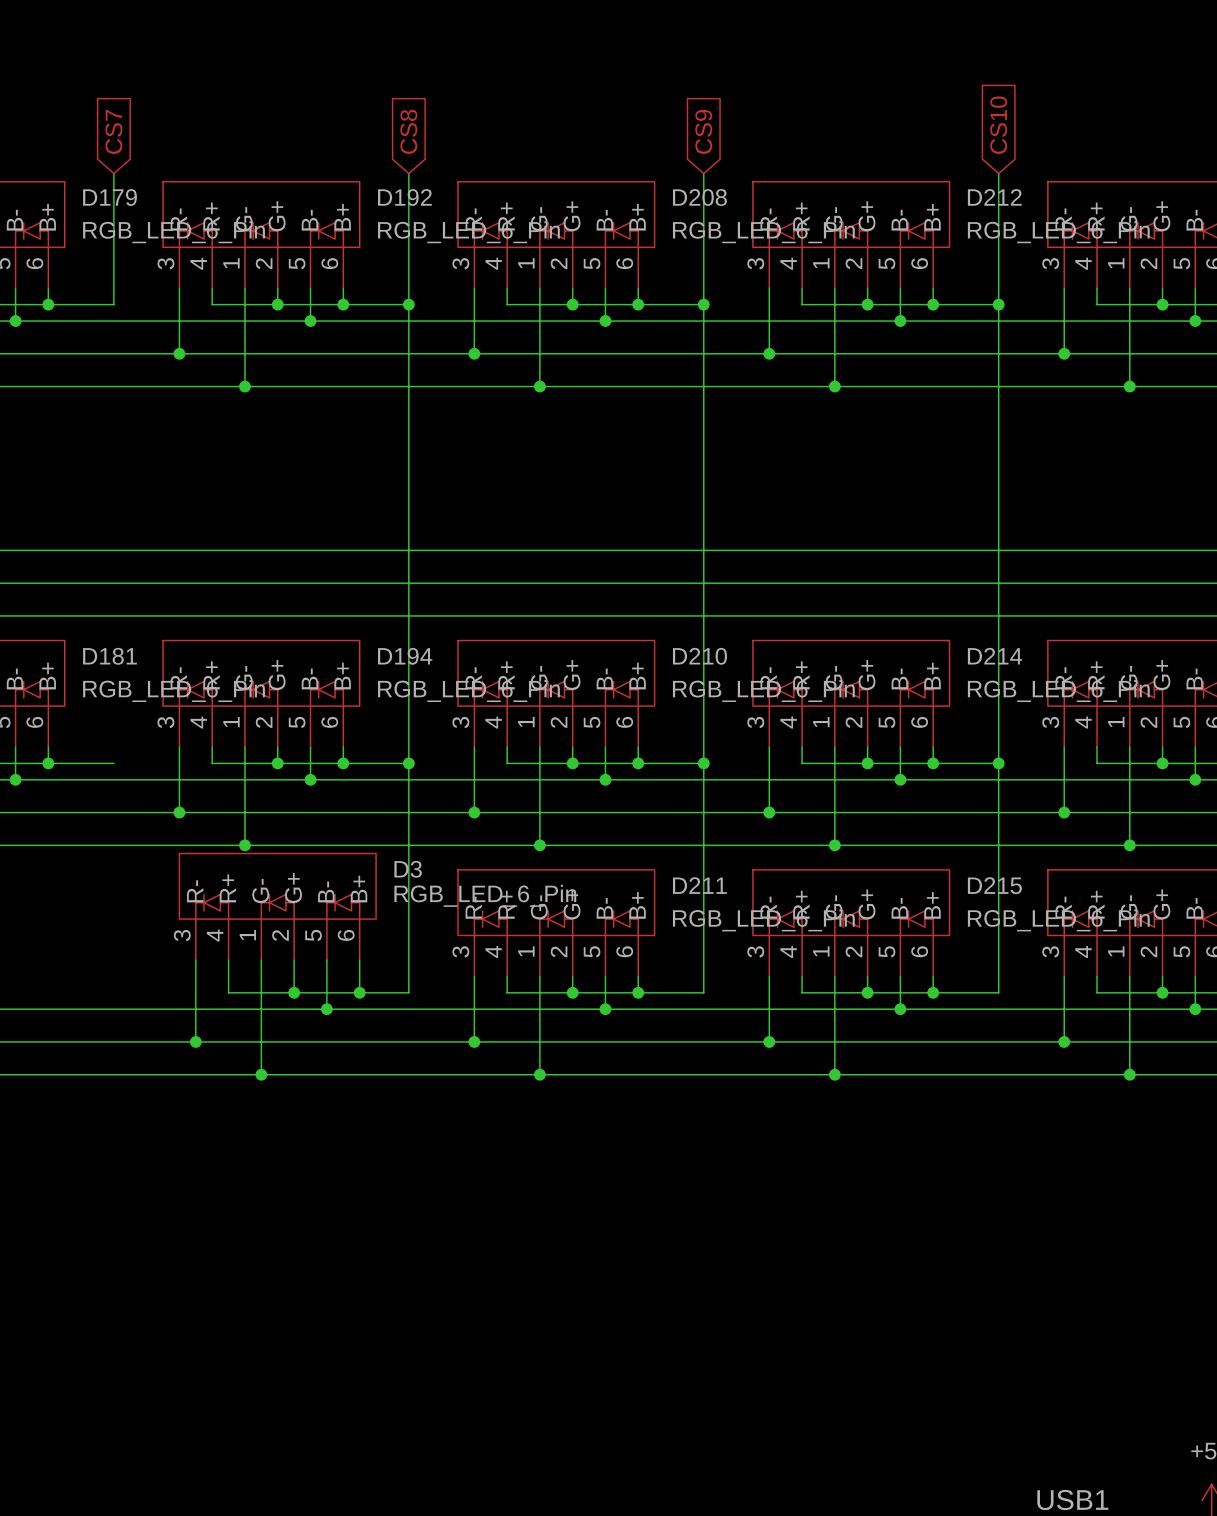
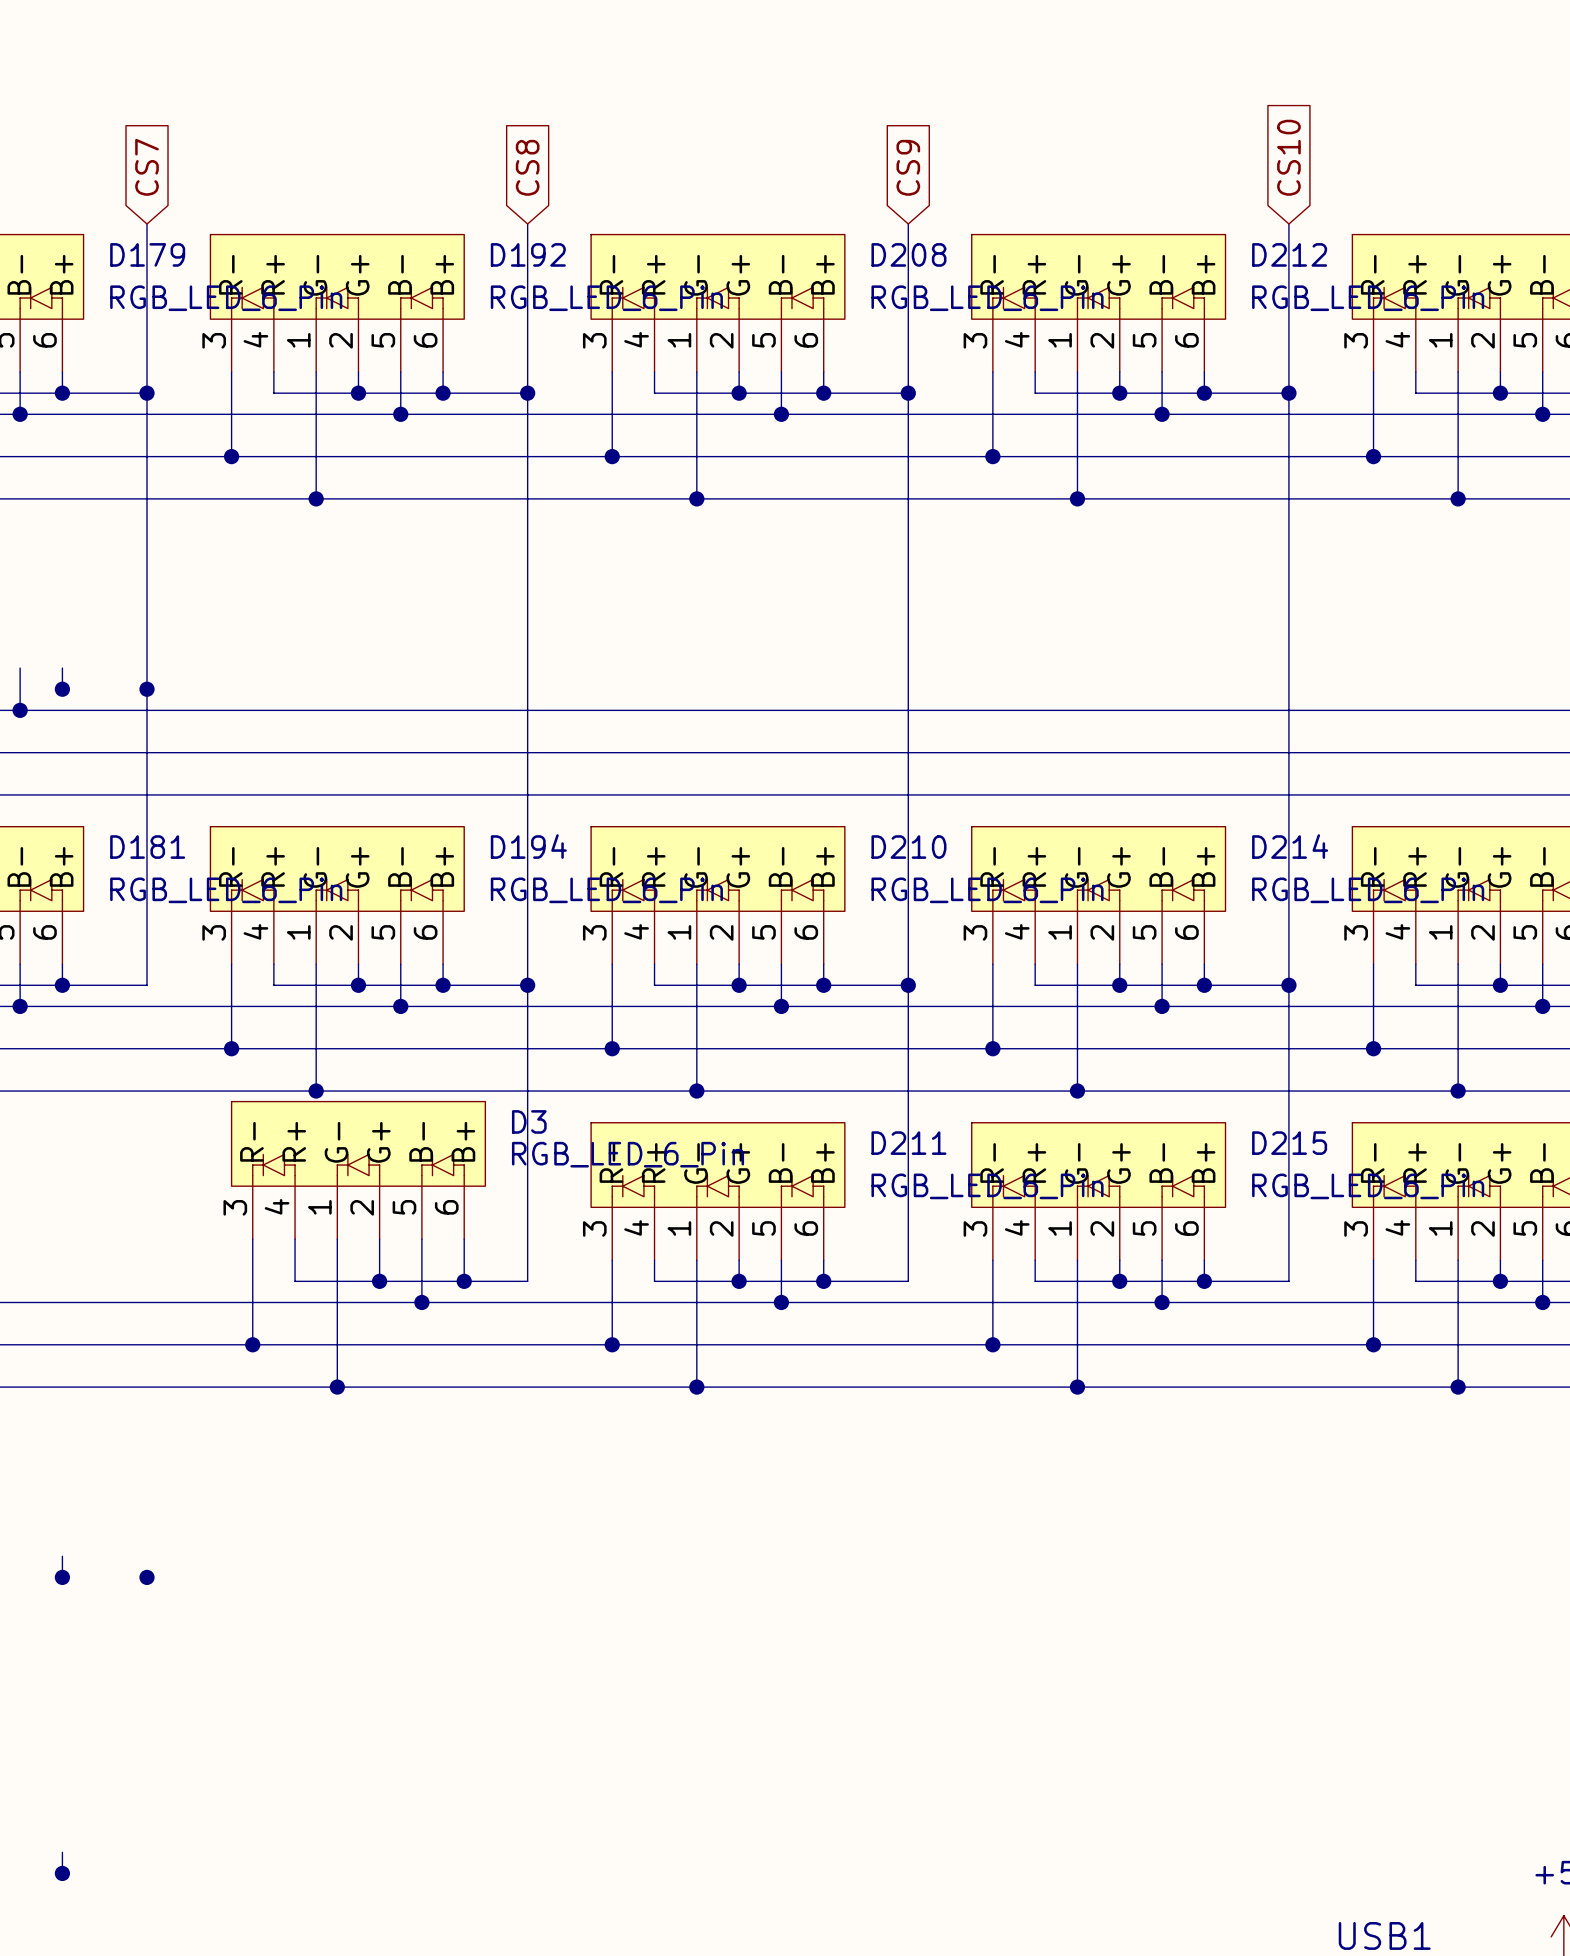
wire: none -> (147, 393) (147, 985)
junction: none -> (147, 393)
wire: none -> (20, 668) (20, 710)
wire: none -> (62, 668) (62, 689)
junction: none -> (62, 689)
junction: none -> (147, 689)
junction: none -> (20, 710)
wire: none -> (62, 1556) (62, 1577)
junction: none -> (62, 1577)
junction: none -> (147, 1577)
wire: none -> (62, 1852) (62, 1873)
junction: none -> (62, 1873)

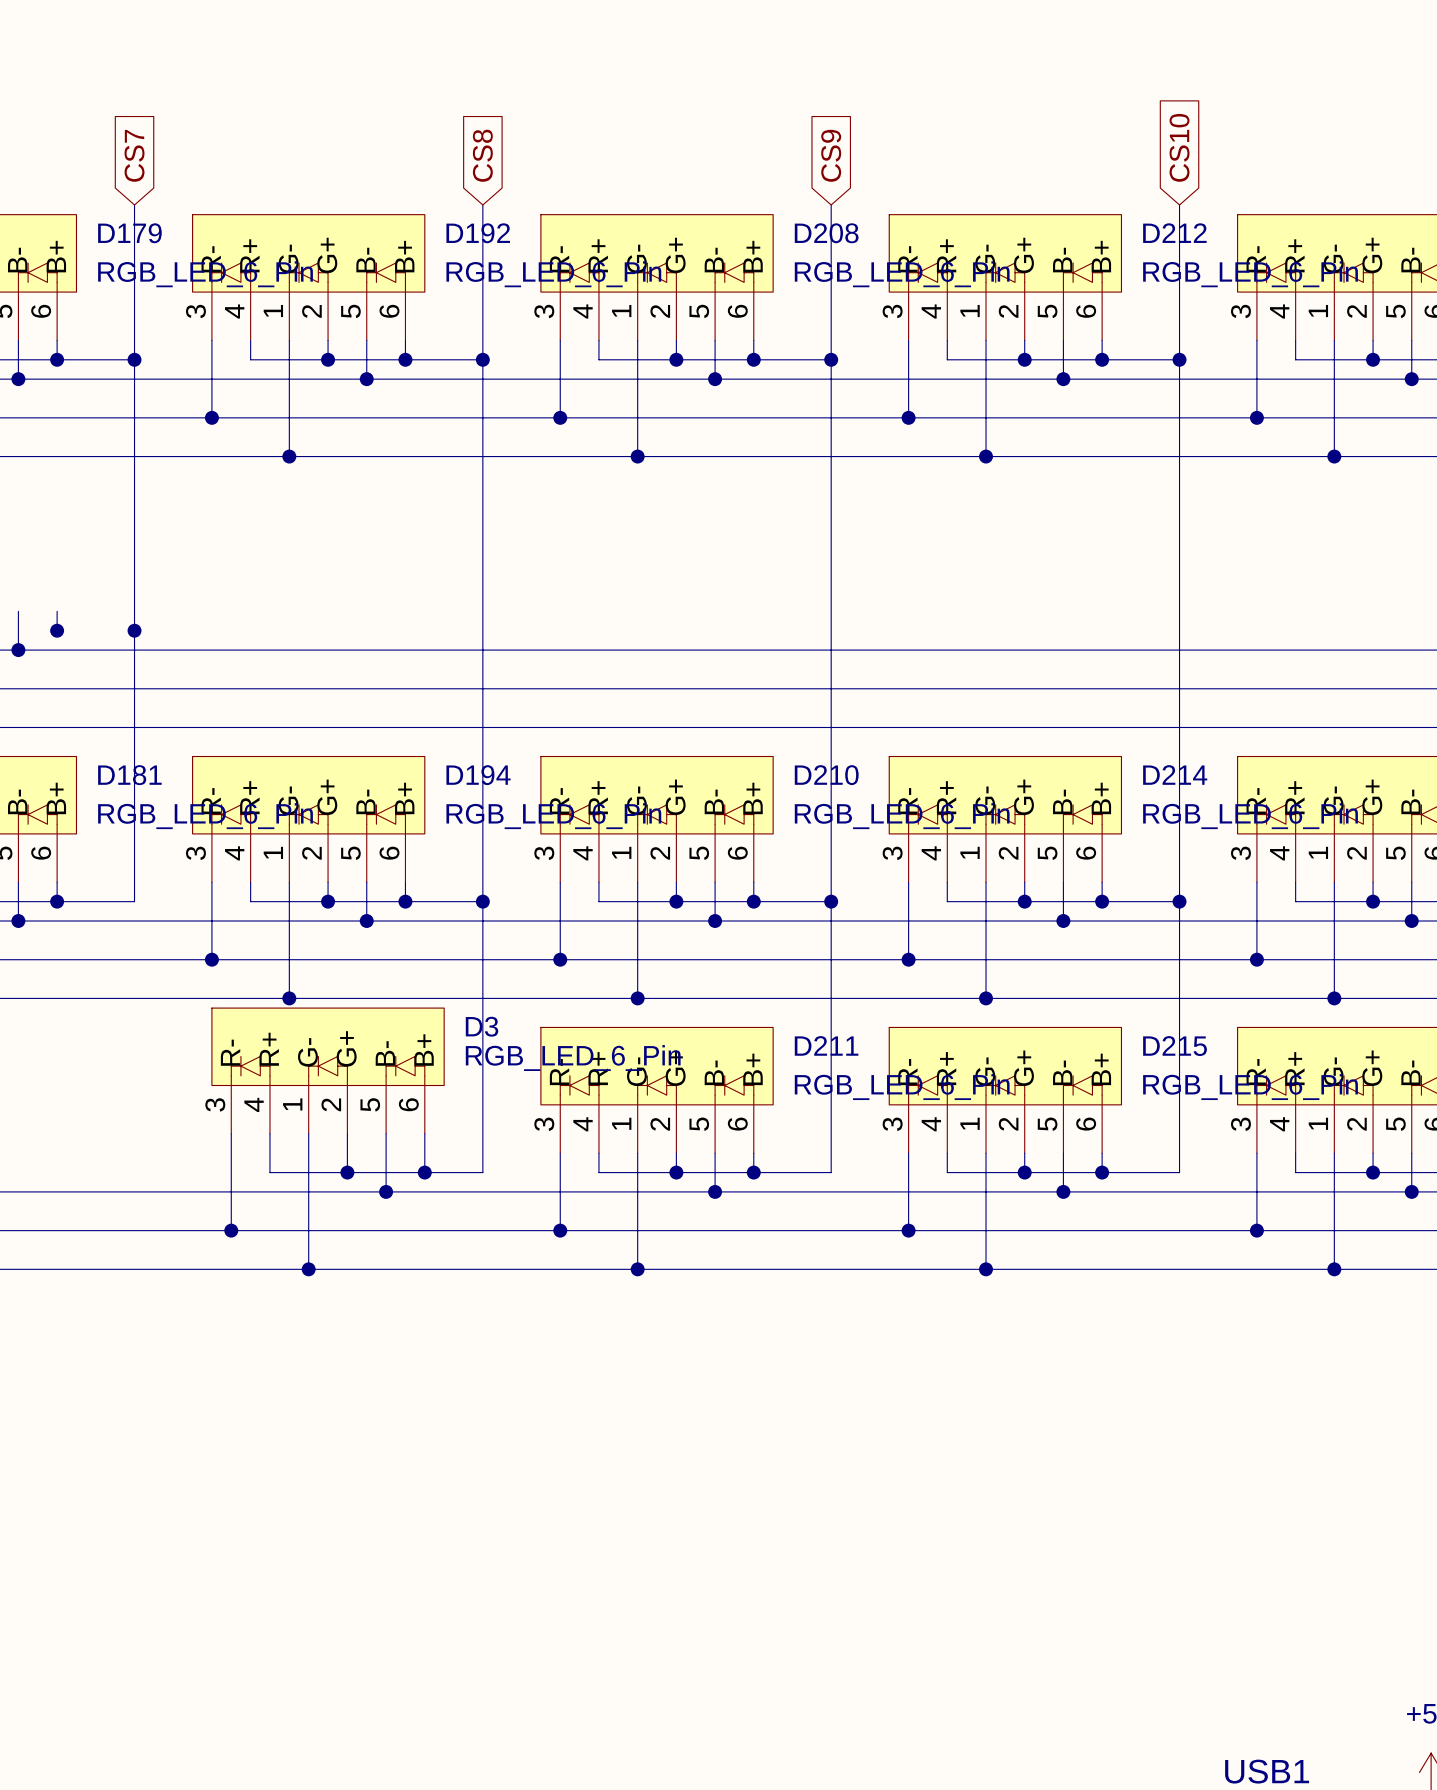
wire: (62, 1556) (62, 1577) -> none
junction: (62, 1577) -> none
junction: (147, 1577) -> none
wire: (62, 1852) (62, 1873) -> none
junction: (62, 1873) -> none

